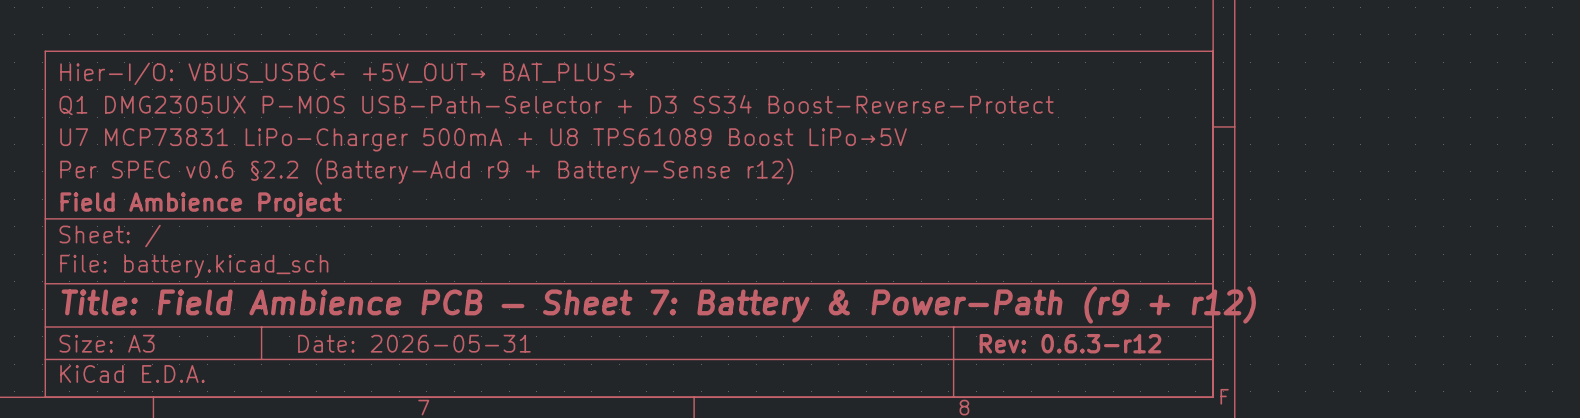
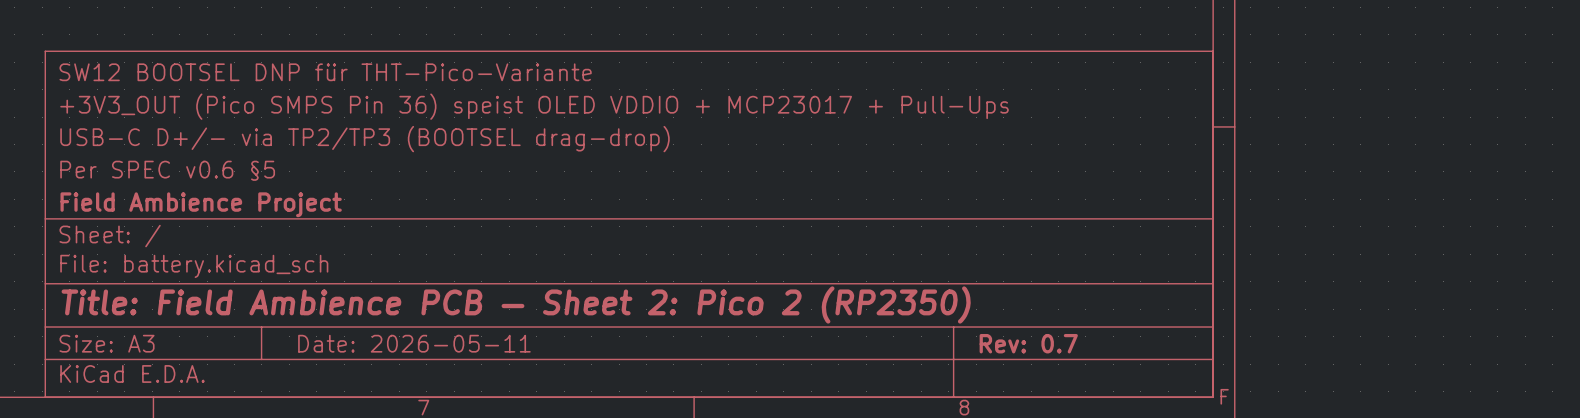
title block: Hier-I/O: VBUS_USBC← +5V_OUT→ BAT_PLUS→ (347, 73) -> SW12 BOOTSEL DNP für THT-Pico-Variante (325, 72)
title block: Q1 DMG2305UX P-MOS USB-Path-Selector + D3 SS34 Boost-Reverse-Protect (556, 105) -> +3V3_OUT (Pico SMPS Pin 36) speist OLED VDDIO + MCP23017 + Pull-Ups (534, 106)
title block: U7 MCP73831 LiPo-Charger 500mA + U8 TPS61089 Boost LiPo→5V (483, 139) -> USB-C D+/- via TP2/TP3 (BOOTSEL drag-drop) (364, 139)
title block: Per SPEC v0.6 §2.2 (Battery-Add r9 + Battery-Sense r12) (426, 171) -> Per SPEC v0.6 §5 (167, 170)
title block: Title: Field Ambience PCB — Sheet 7: Battery & Power-Path (r9 + r12) (658, 304) -> Title: Field Ambience PCB — Sheet 2: Pico 2 (RP2350) (516, 304)
title block: Date: 2026-05-31 (414, 343) -> Date: 2026-05-11 (414, 343)
title block: Rev: 0.6.3-r12 (1070, 343) -> Rev: 0.7 (1028, 343)

